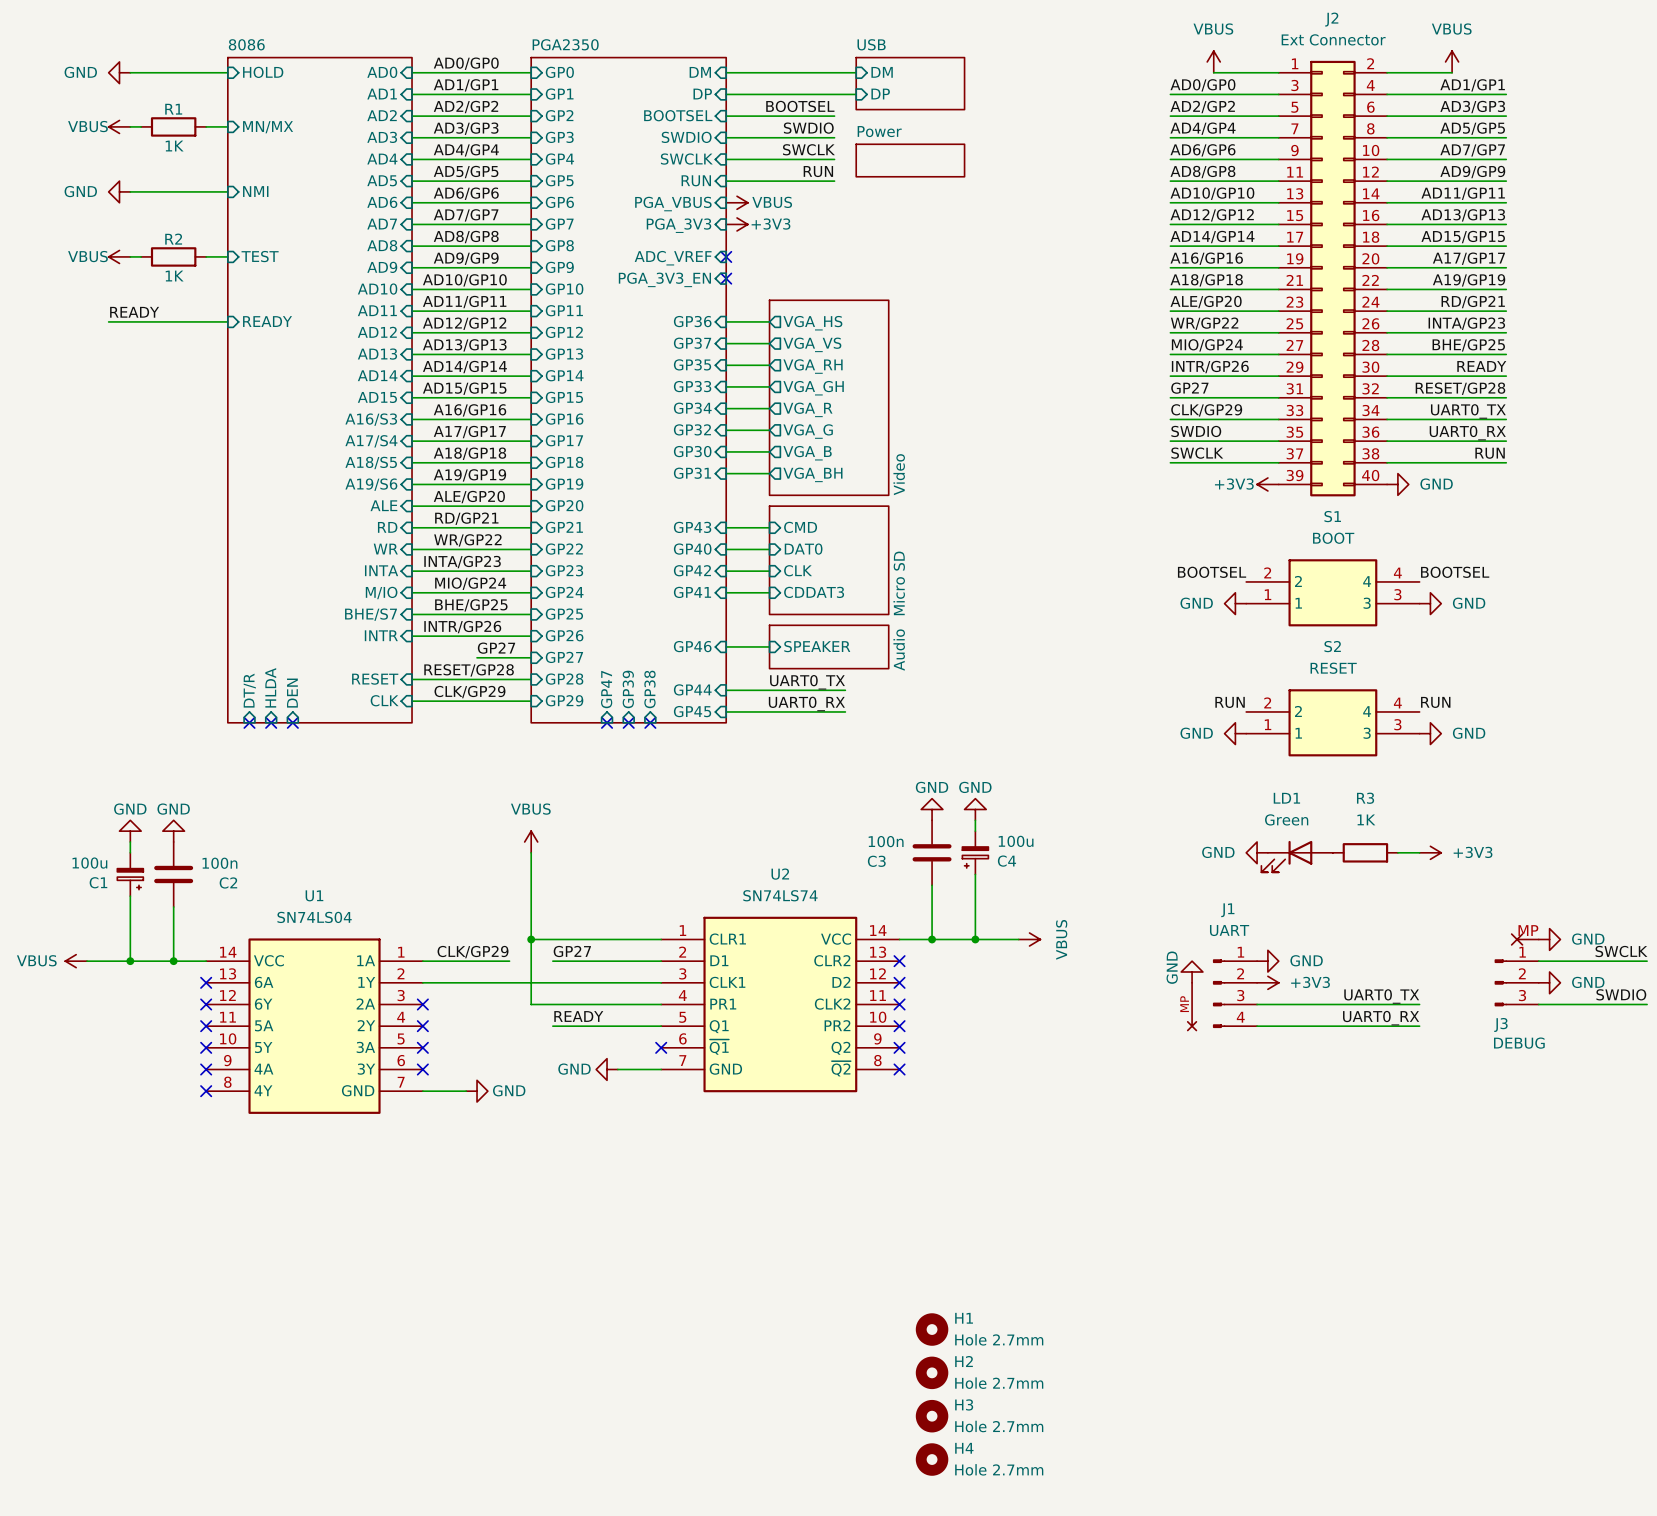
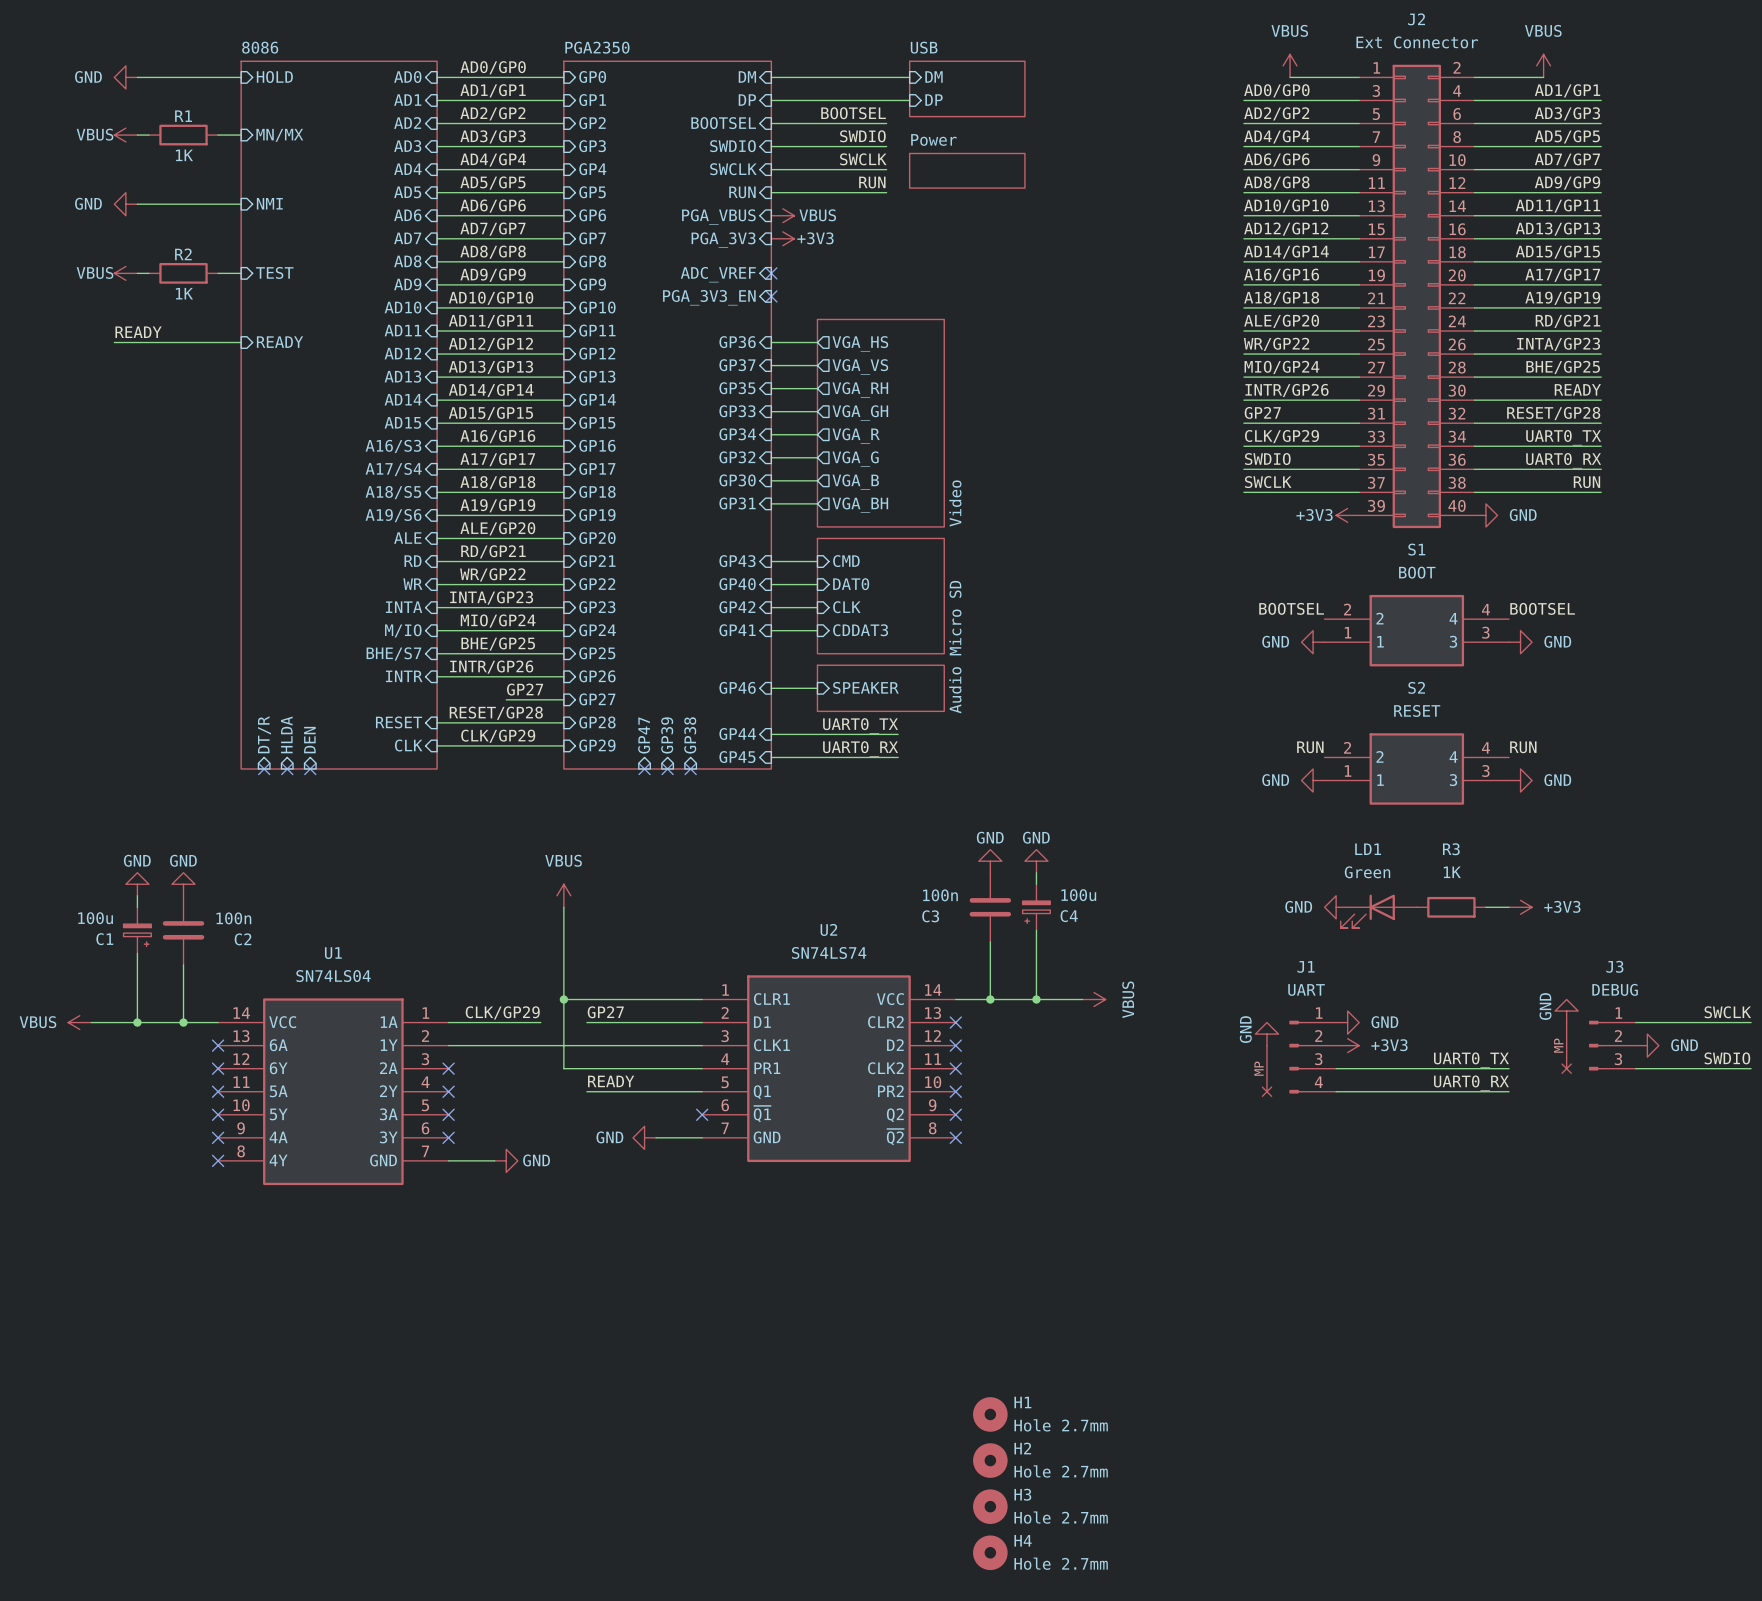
J3 symbol: [1494, 934, 1539, 1007] -> [1562, 1020, 1636, 1074]
power symbol rotation: 0° (1549, 939) -> 90° counterclockwise (1566, 1011)
power symbol position: GND (1549, 939) -> GND (1566, 1011)
power symbol text position: GND (1588, 939) -> GND (1545, 1006)
J3 name position: J3 (1500, 1024) -> J3 (1614, 966)
J3 value position: DEBUG (1519, 1043) -> DEBUG (1615, 989)

